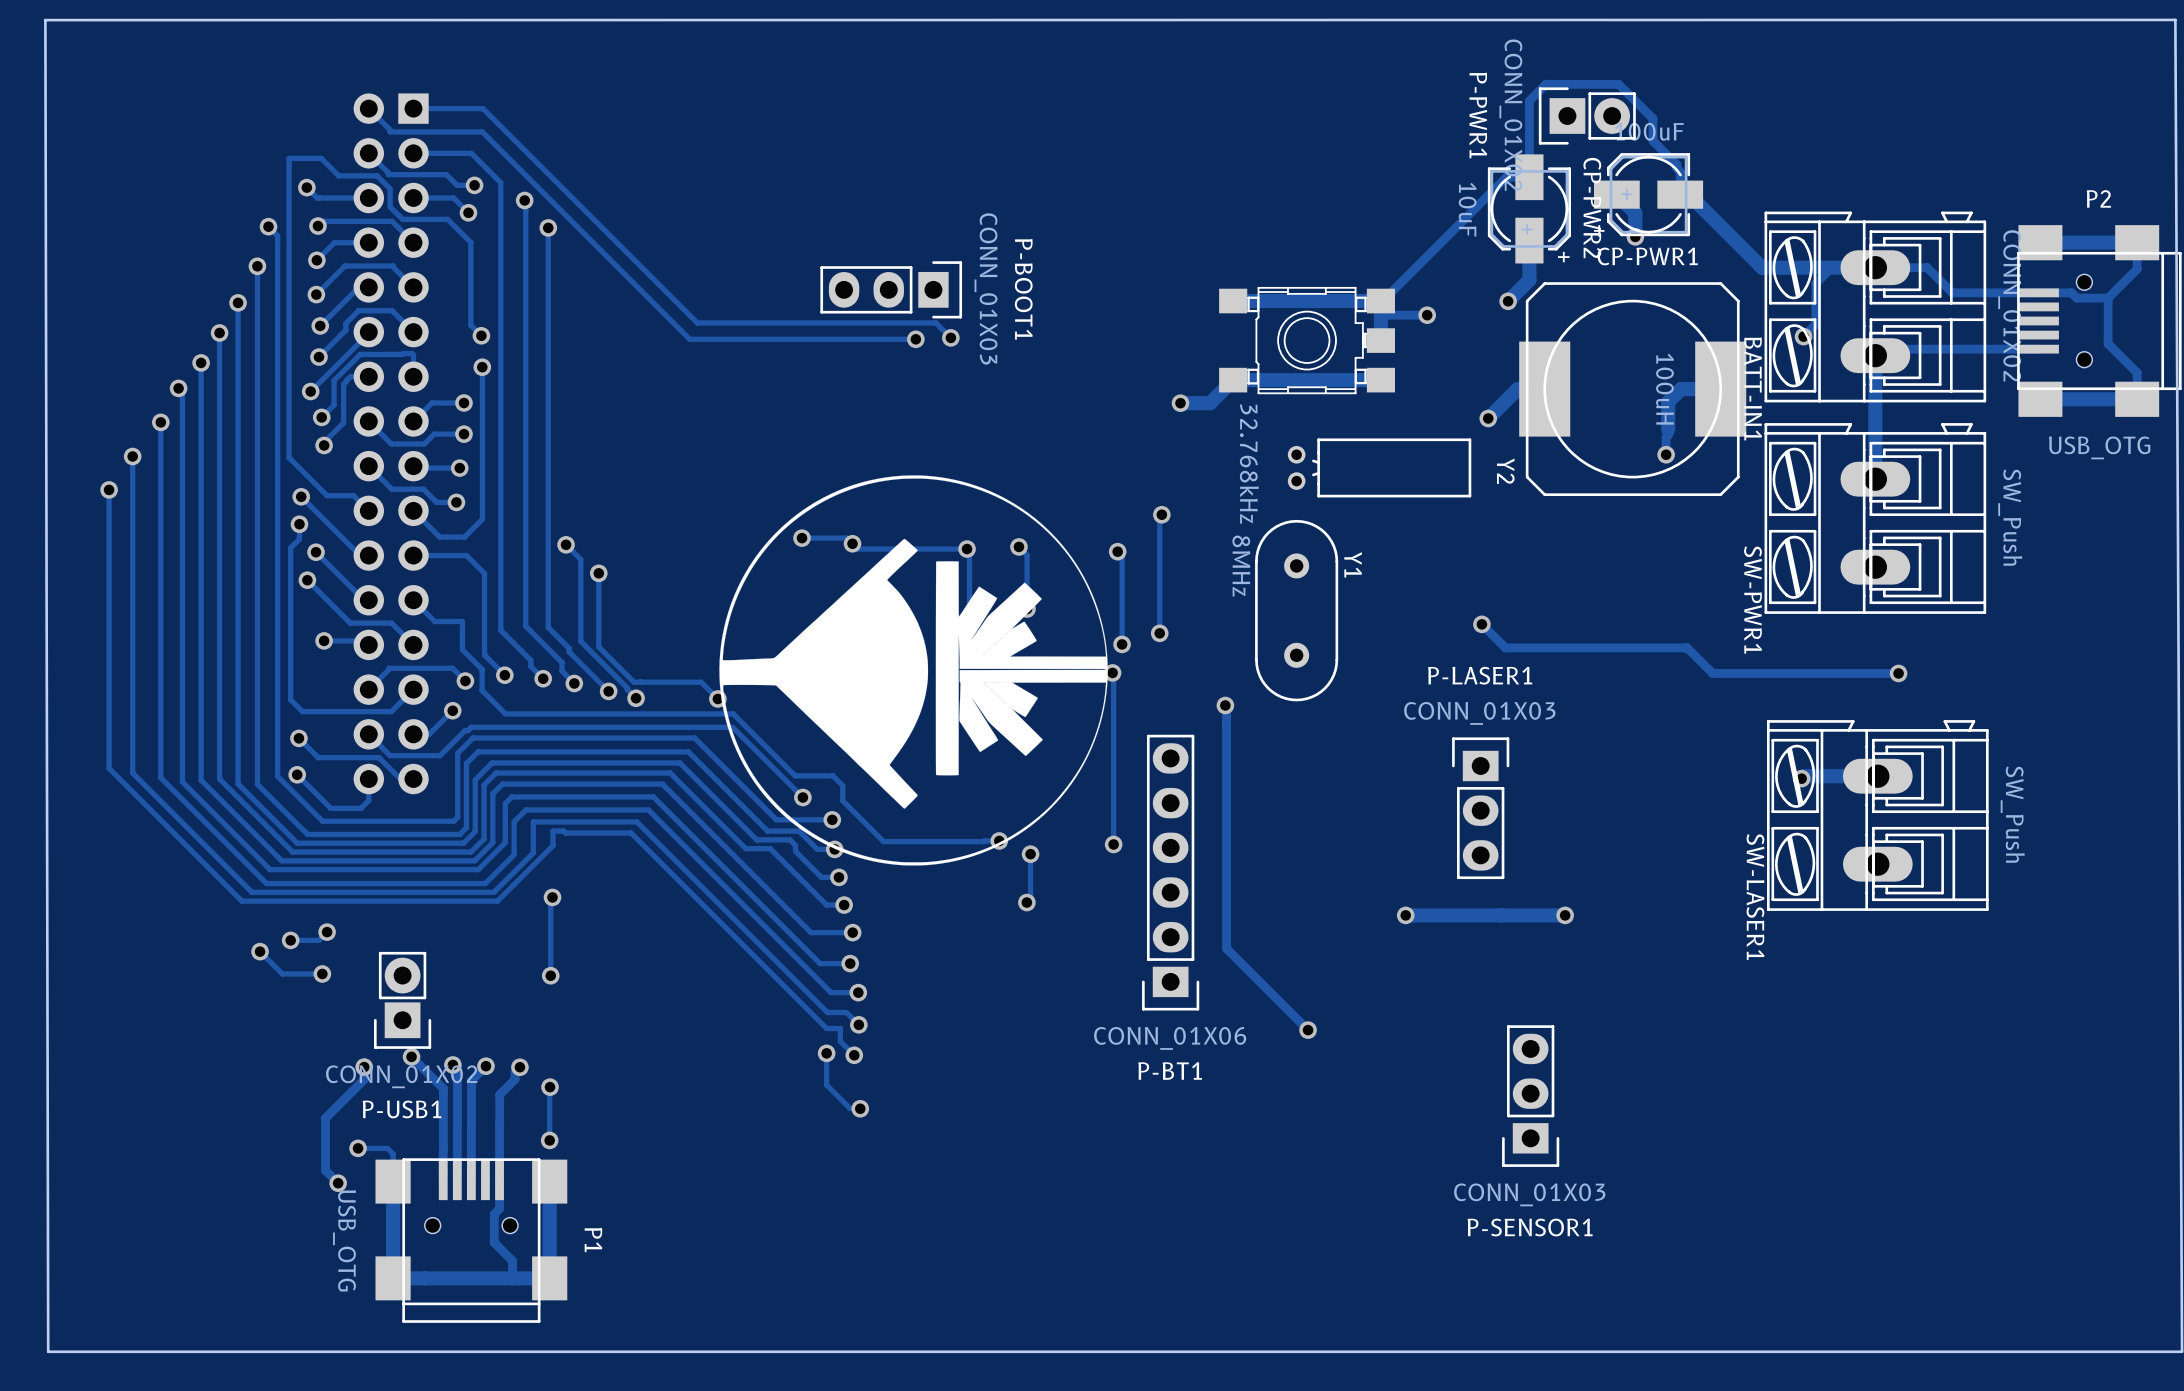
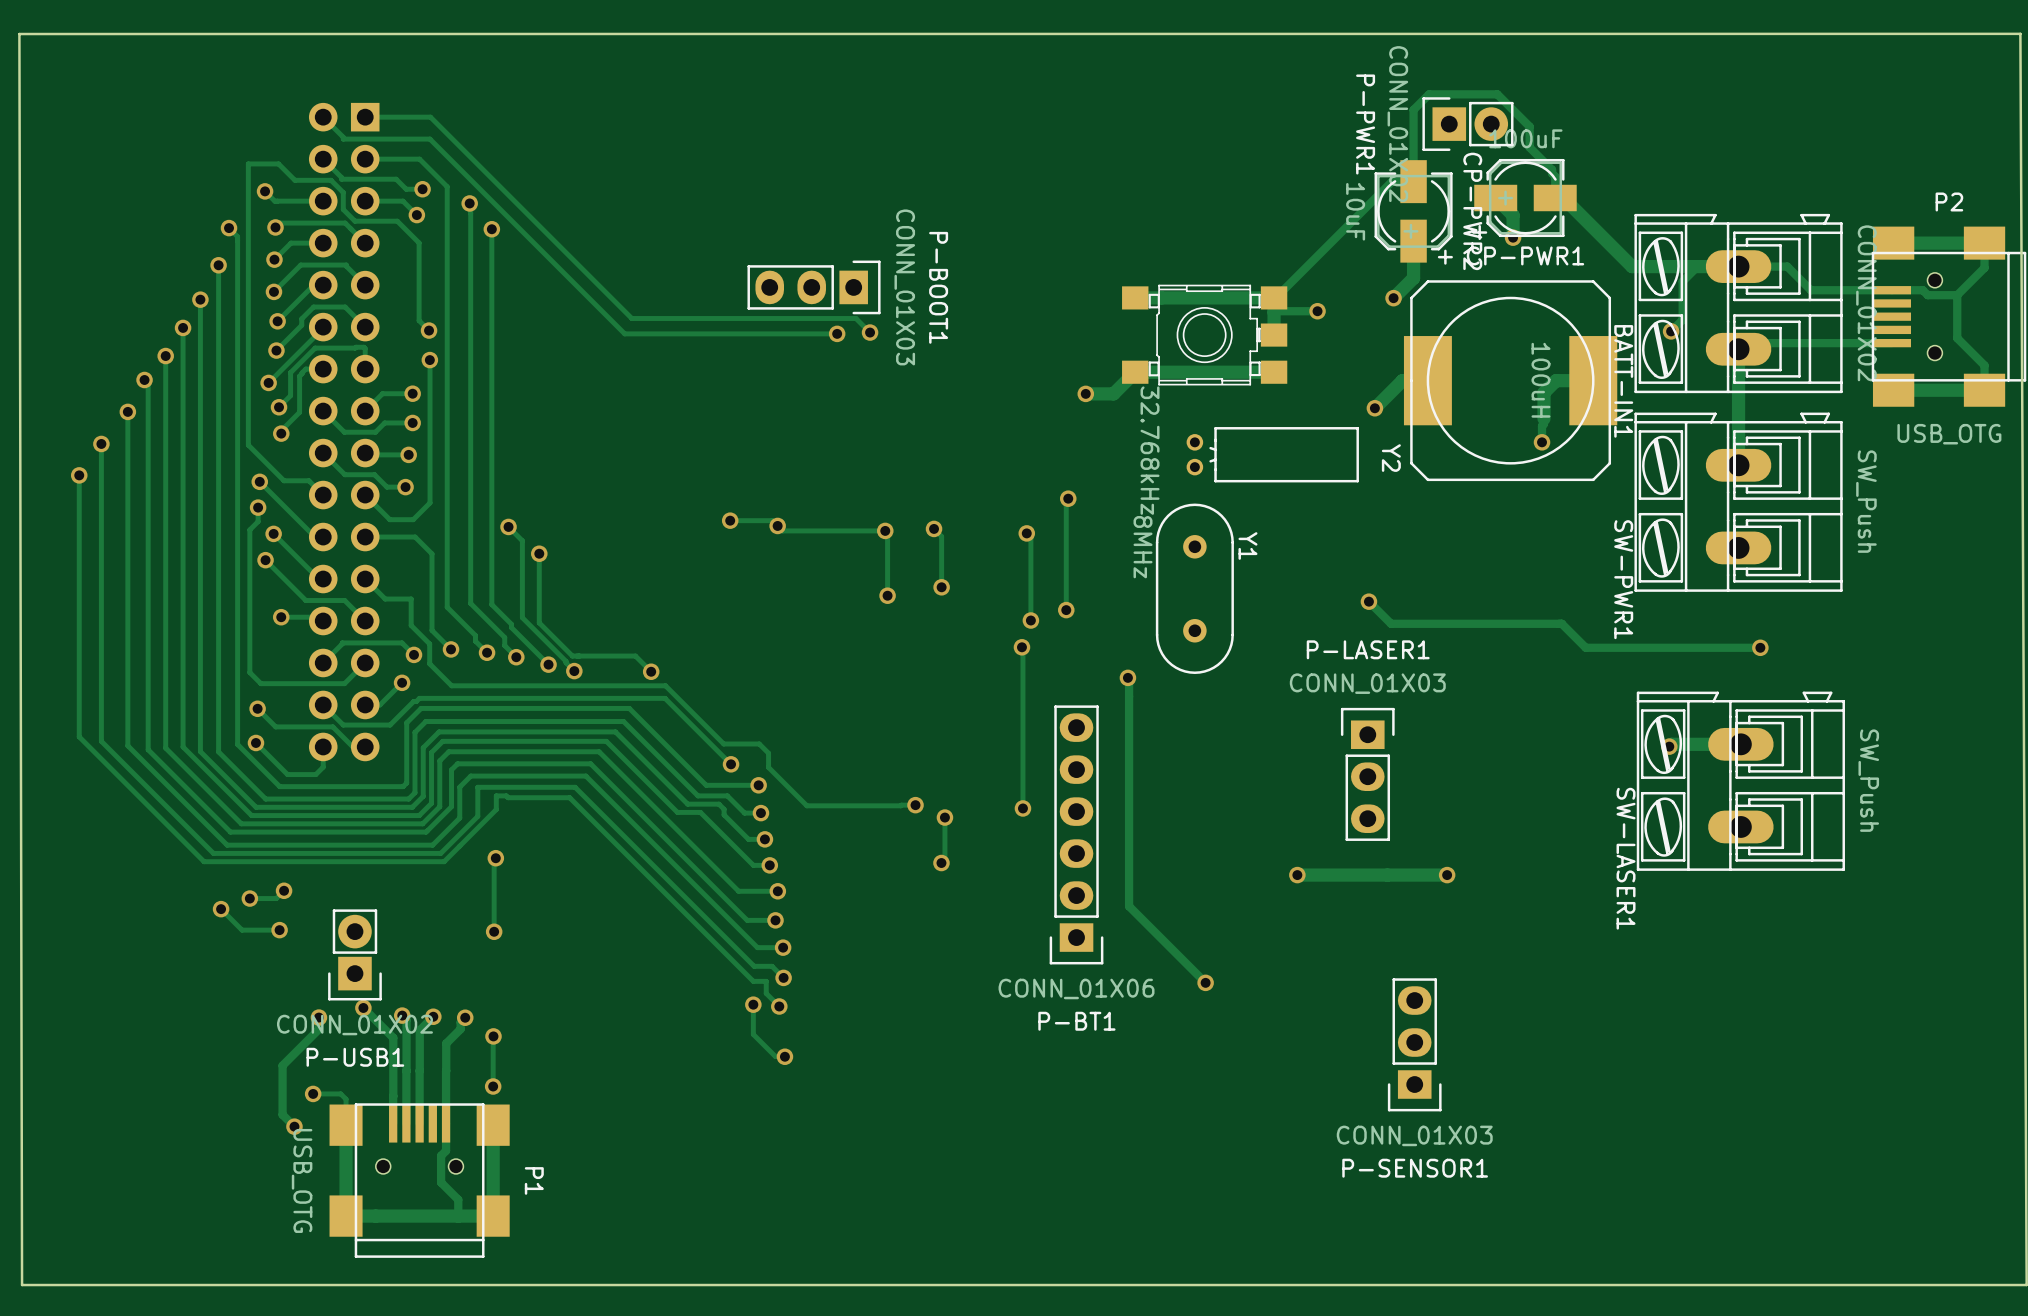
drawing: [719, 475, 1108, 866] -> none

